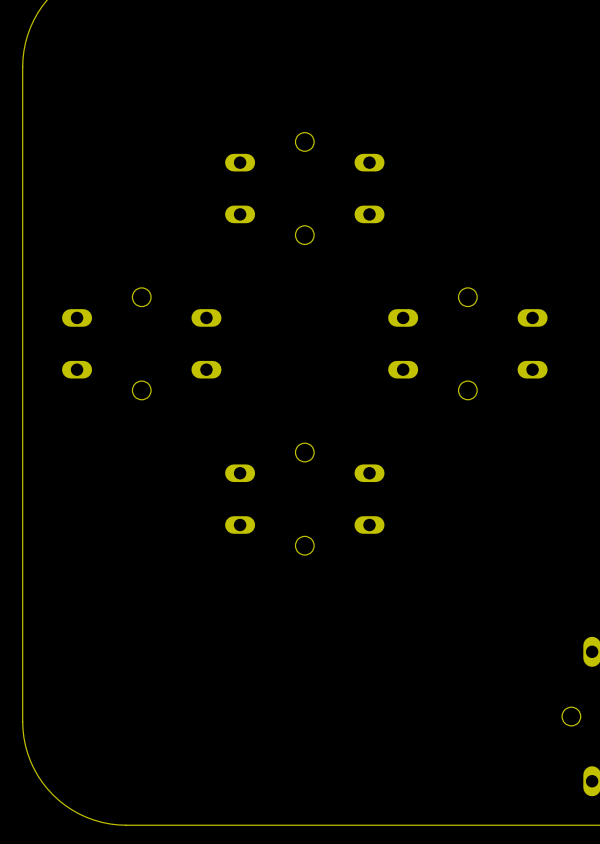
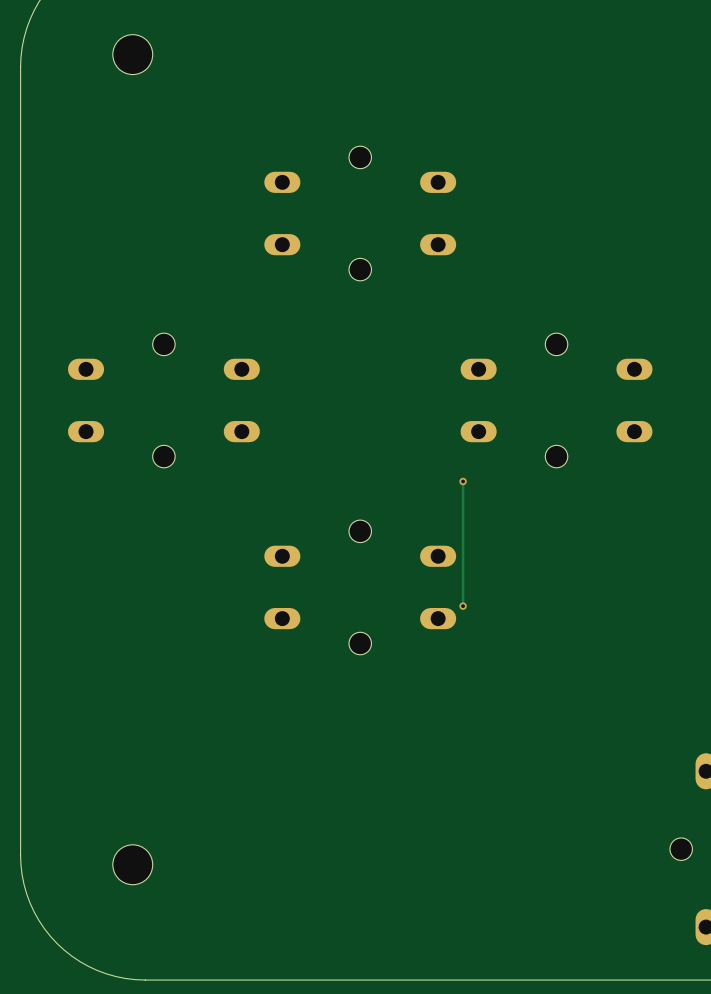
part: none -> (132, 54)
track: none -> (463, 481) (463, 606)
via: none -> (463, 481)
via: none -> (463, 606)
part: none -> (132, 864)

